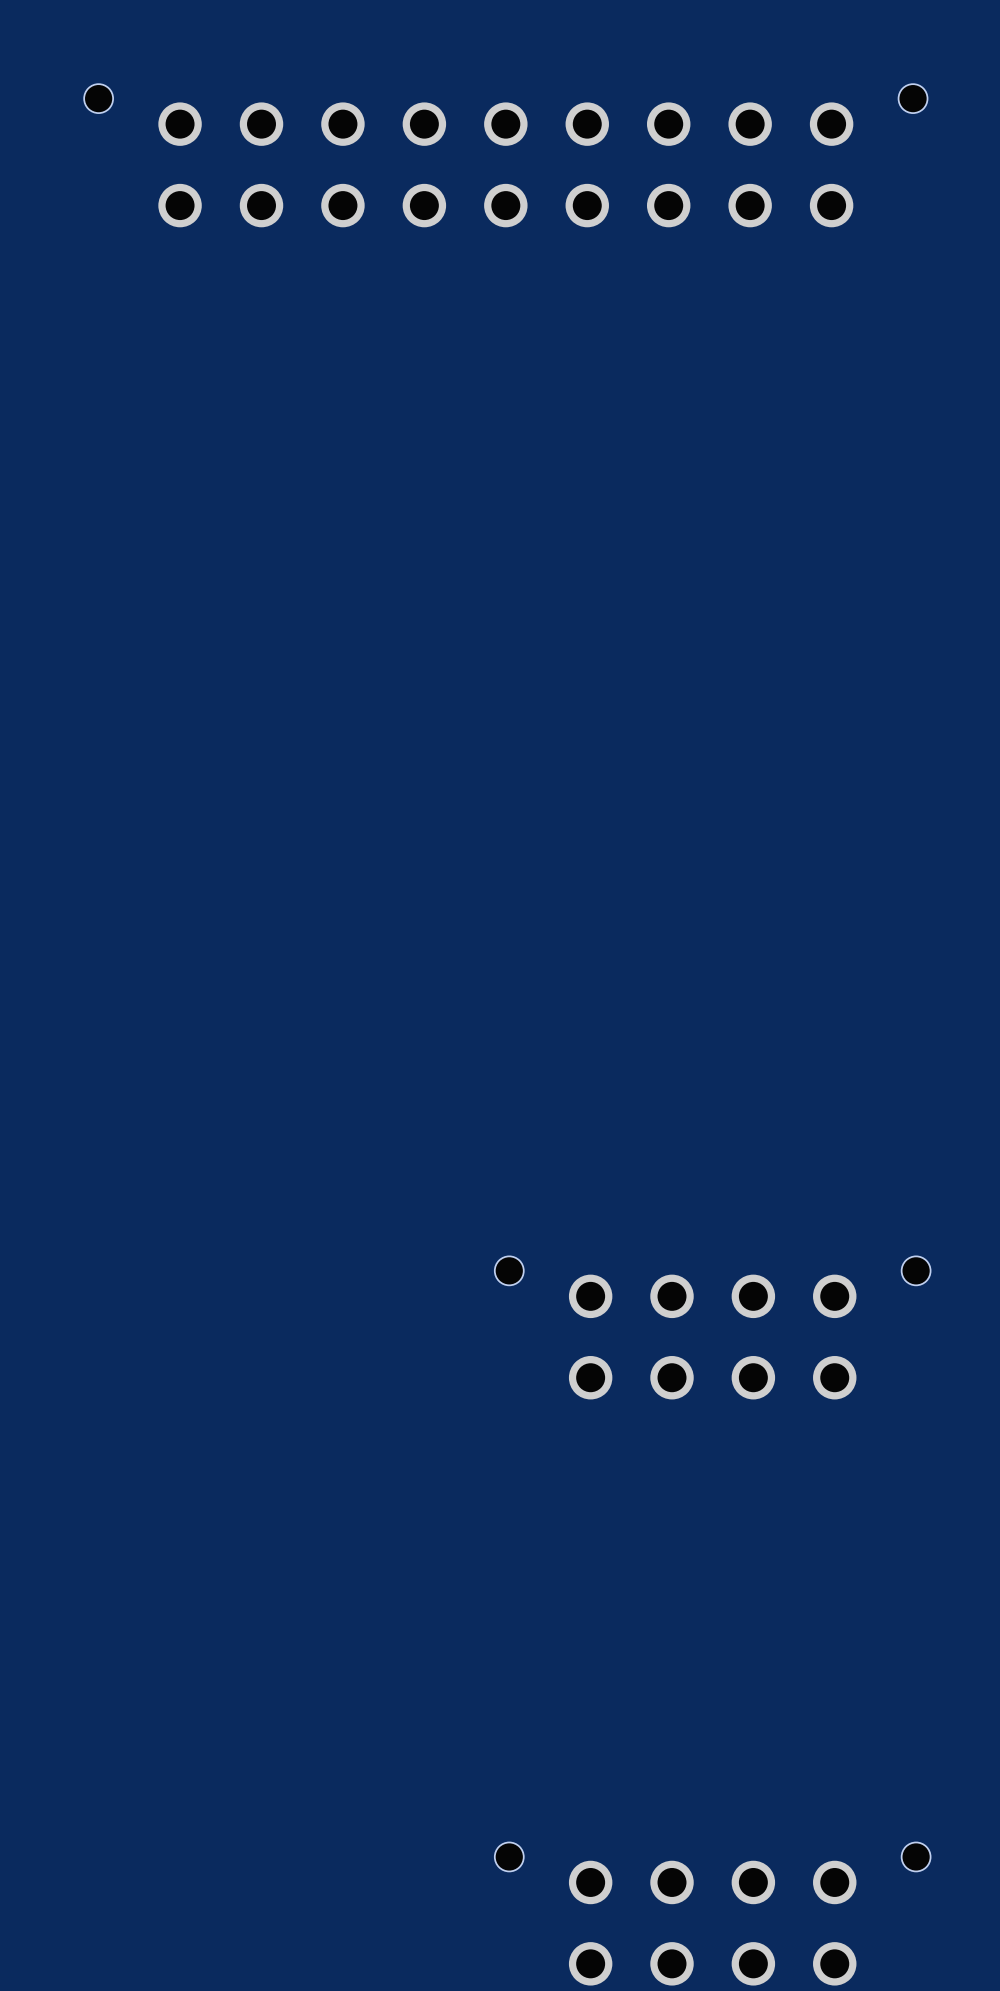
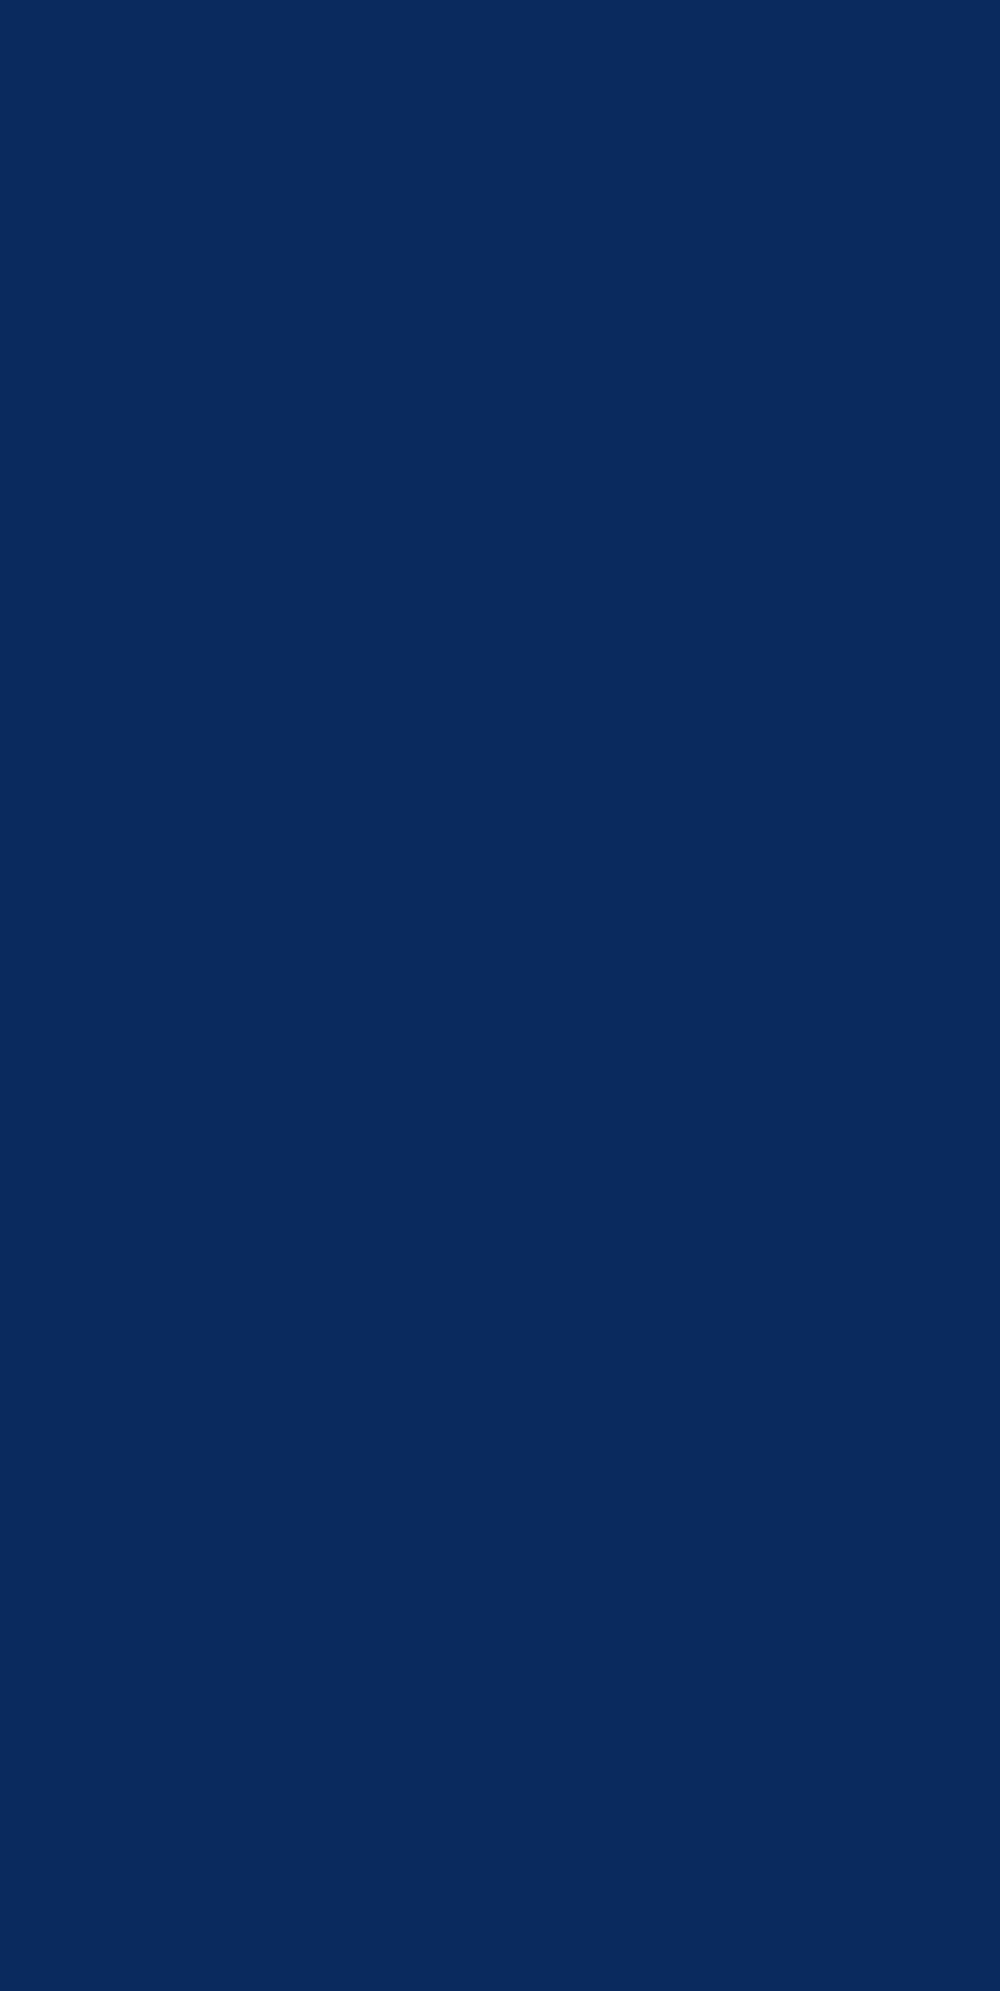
part: (505, 155) -> none
part: (712, 1327) -> none
part: (712, 1914) -> none

